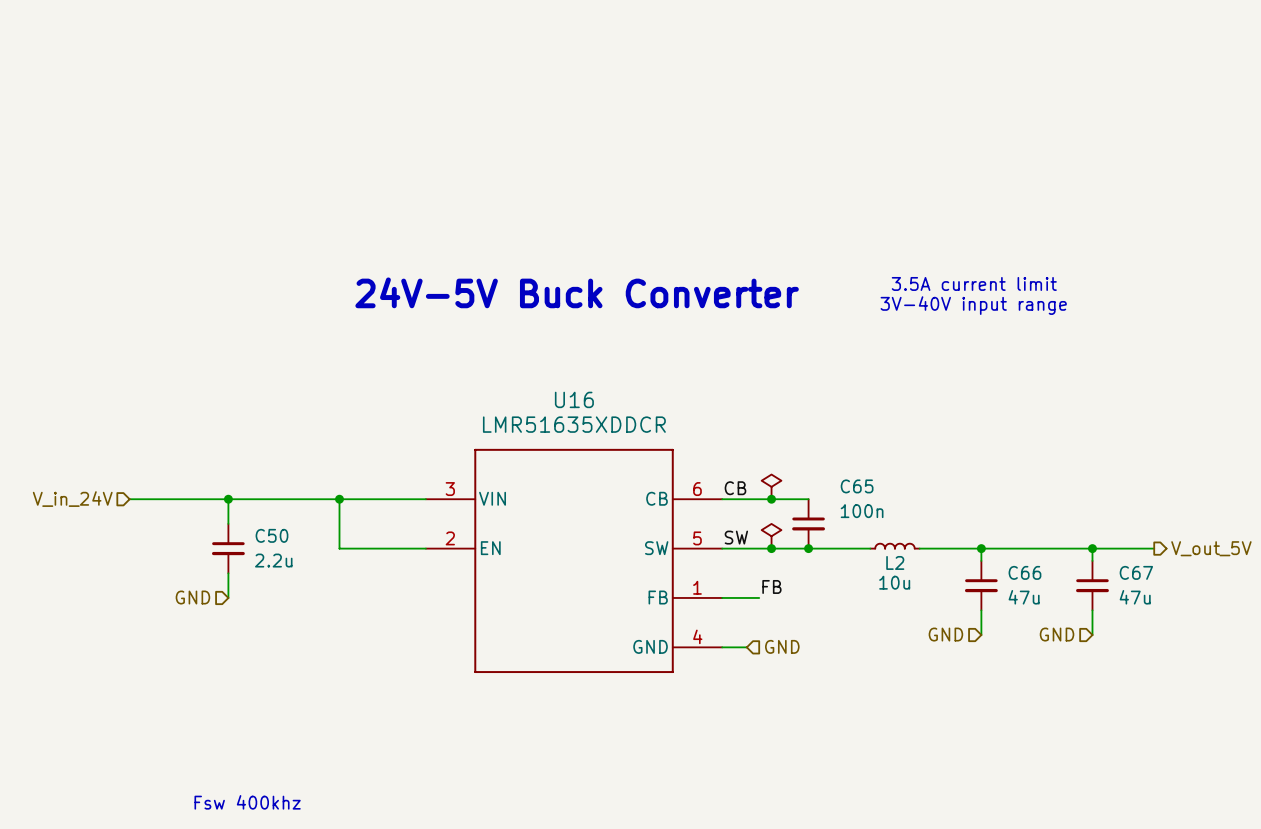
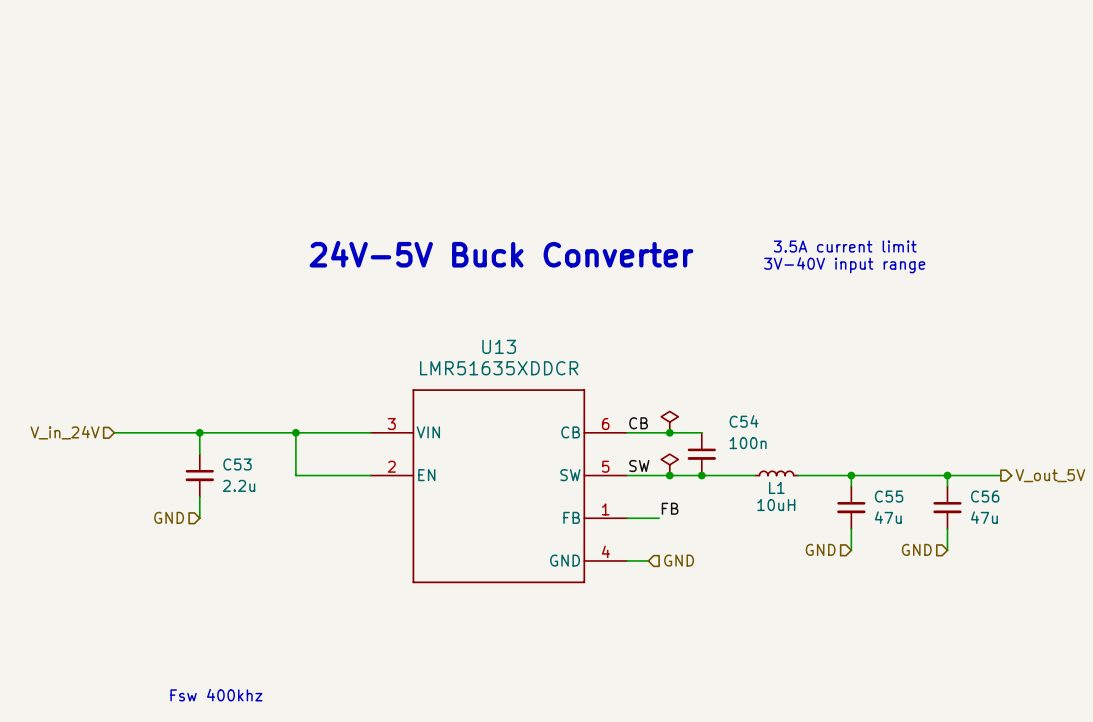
U16 name: U16 (574, 399) -> U13 (499, 346)
C65 name: C65 (857, 486) -> C54 (744, 421)
C50 name: C50 (271, 535) -> C53 (237, 464)
L2 name: L2 (895, 562) -> L1 (776, 487)
C66 name: C66 (1024, 572) -> C55 (889, 496)
C67 name: C67 (1136, 572) -> C56 (985, 496)
L2 value: 10u (894, 582) -> 10uH (776, 505)

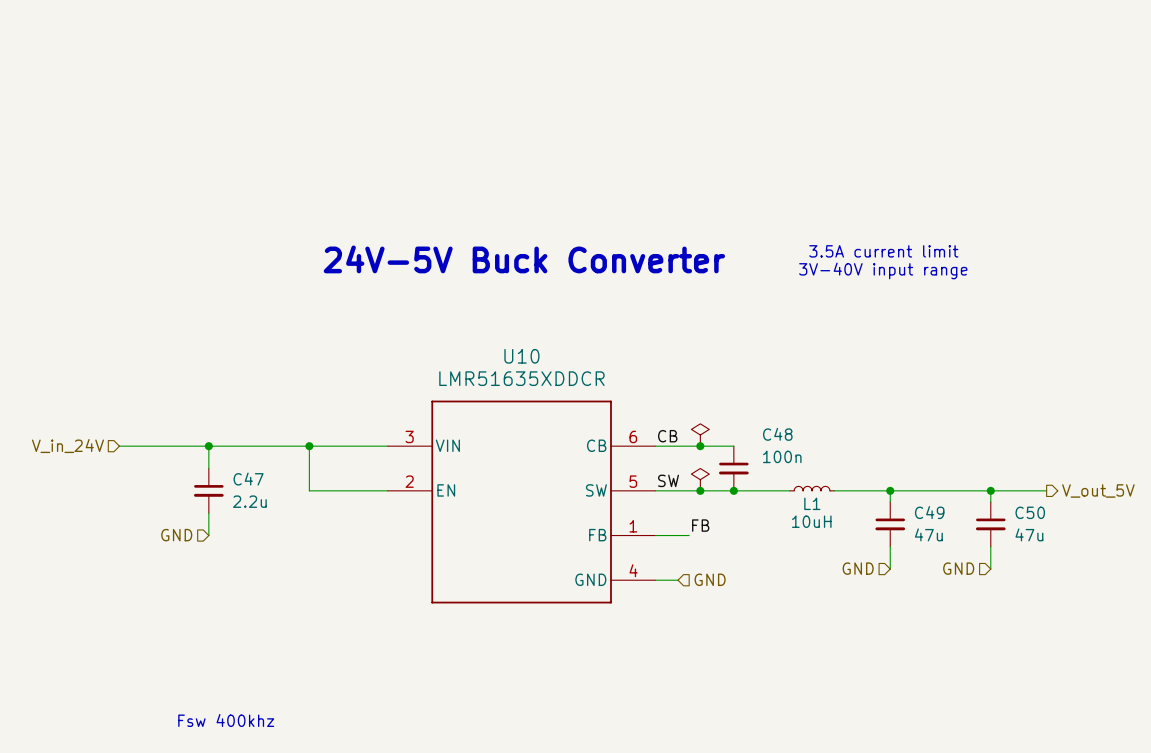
U13 name: U13 (499, 346) -> U10 (521, 356)
C54 name: C54 (744, 421) -> C48 (777, 434)
C53 name: C53 (237, 464) -> C47 (248, 479)
C55 name: C55 (889, 496) -> C49 (929, 512)
C56 name: C56 (985, 496) -> C50 (1030, 512)

